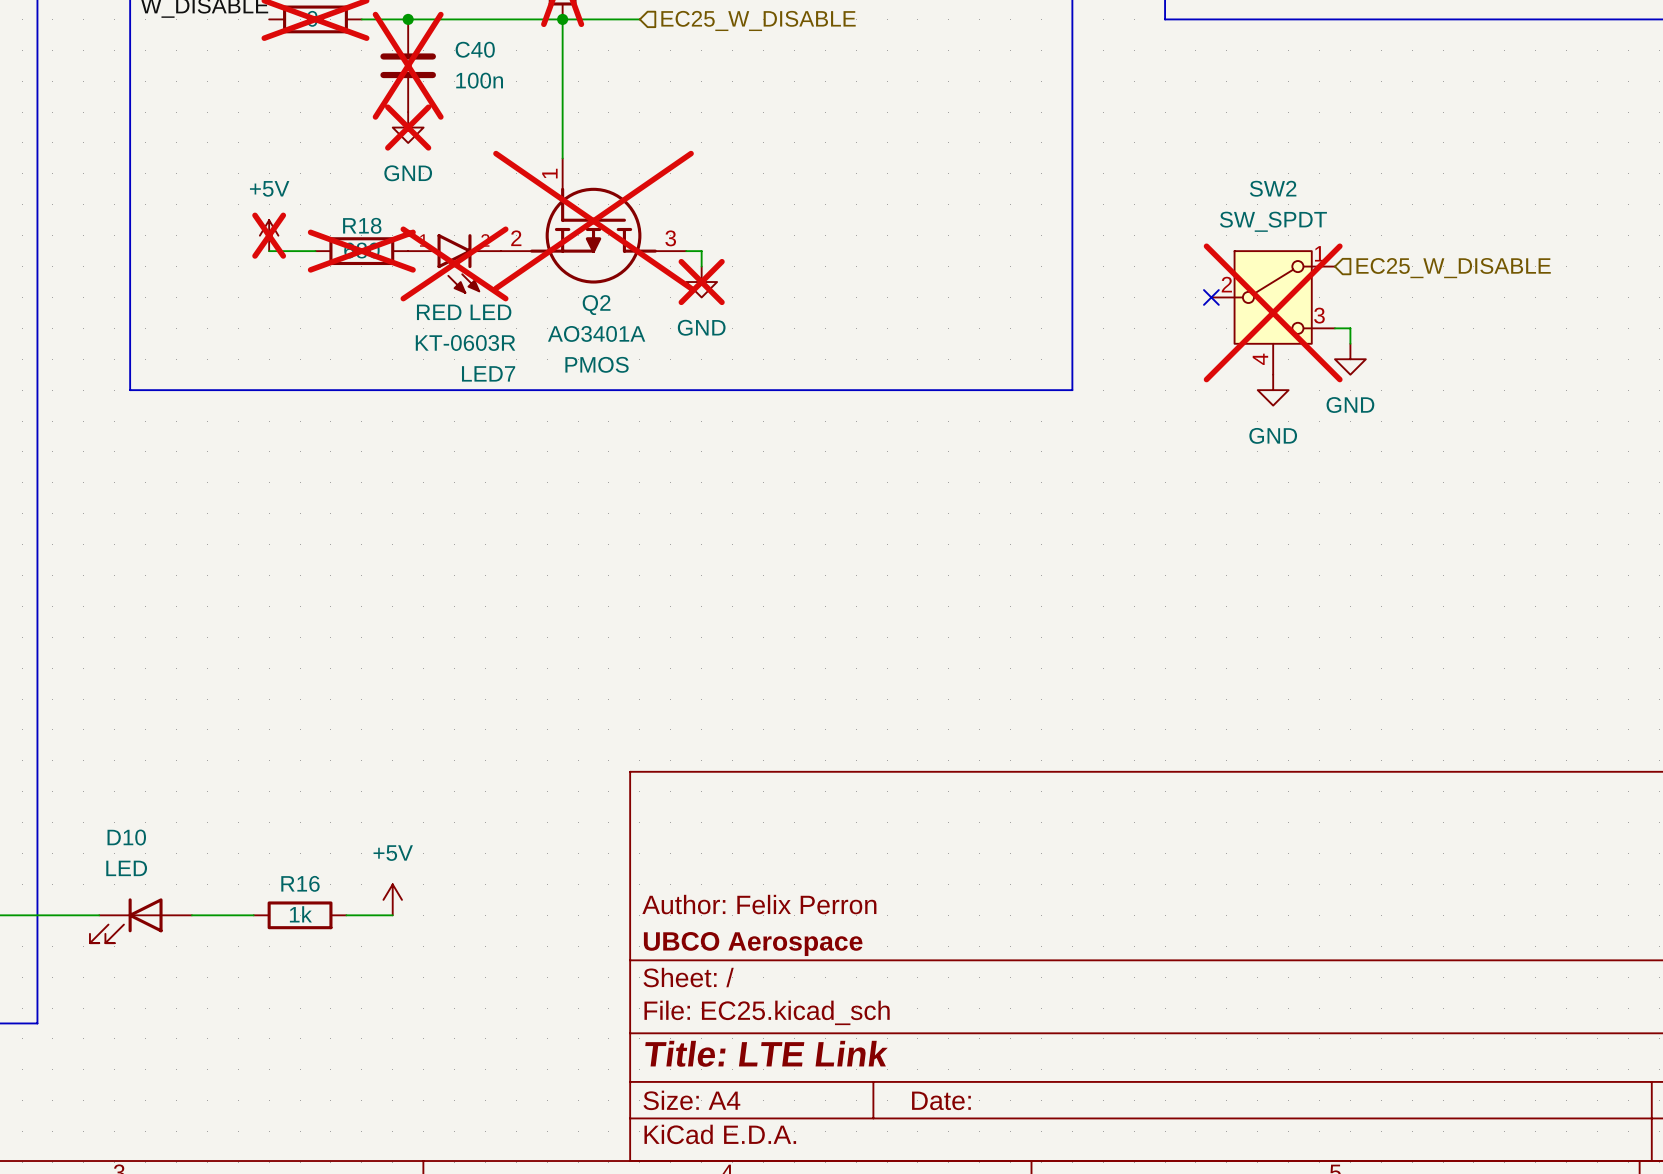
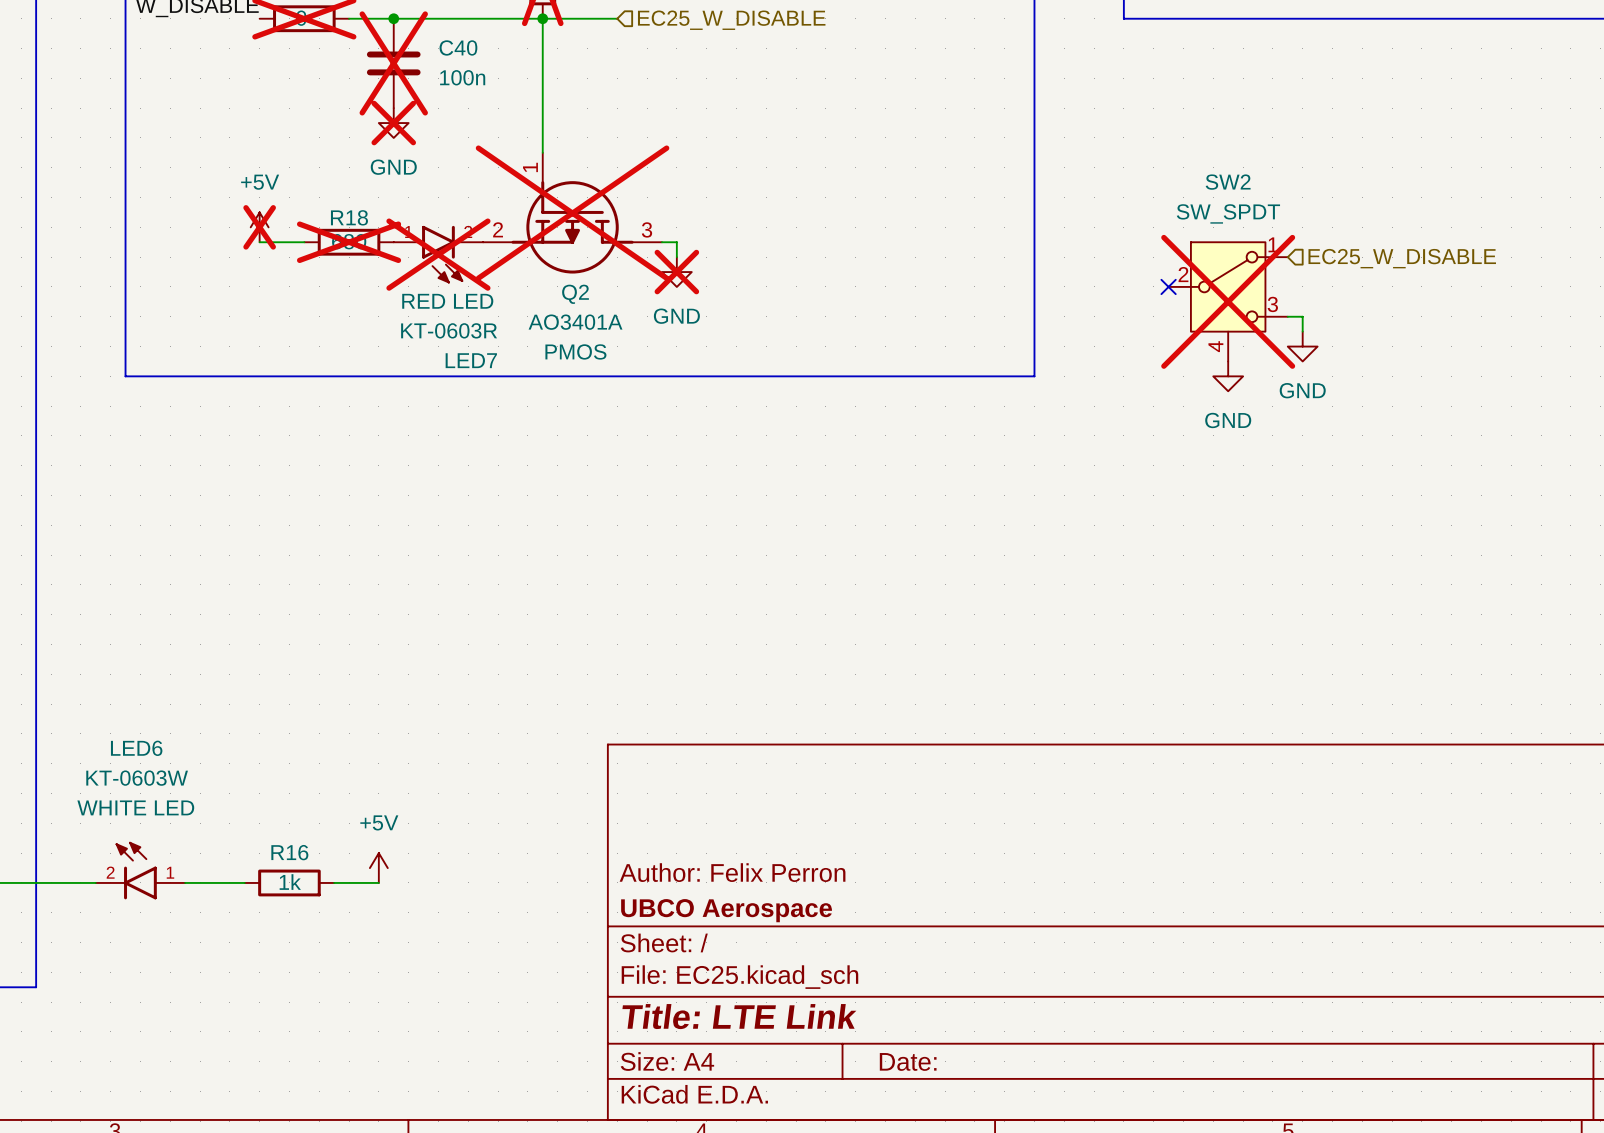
LED6: none -> KT-0603W (140, 870)
D10: LED (140, 920) -> none

